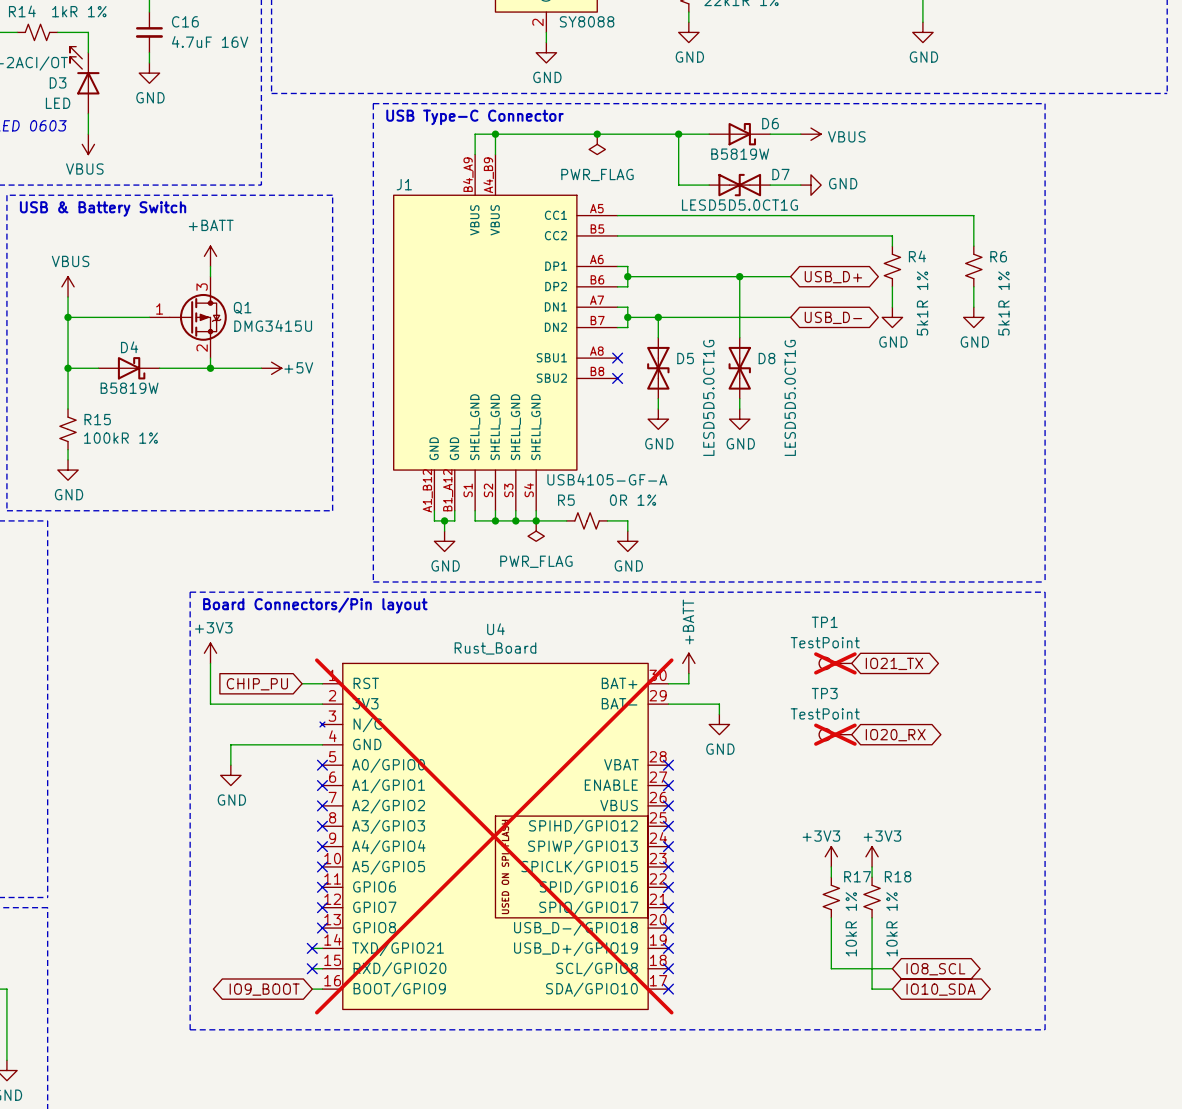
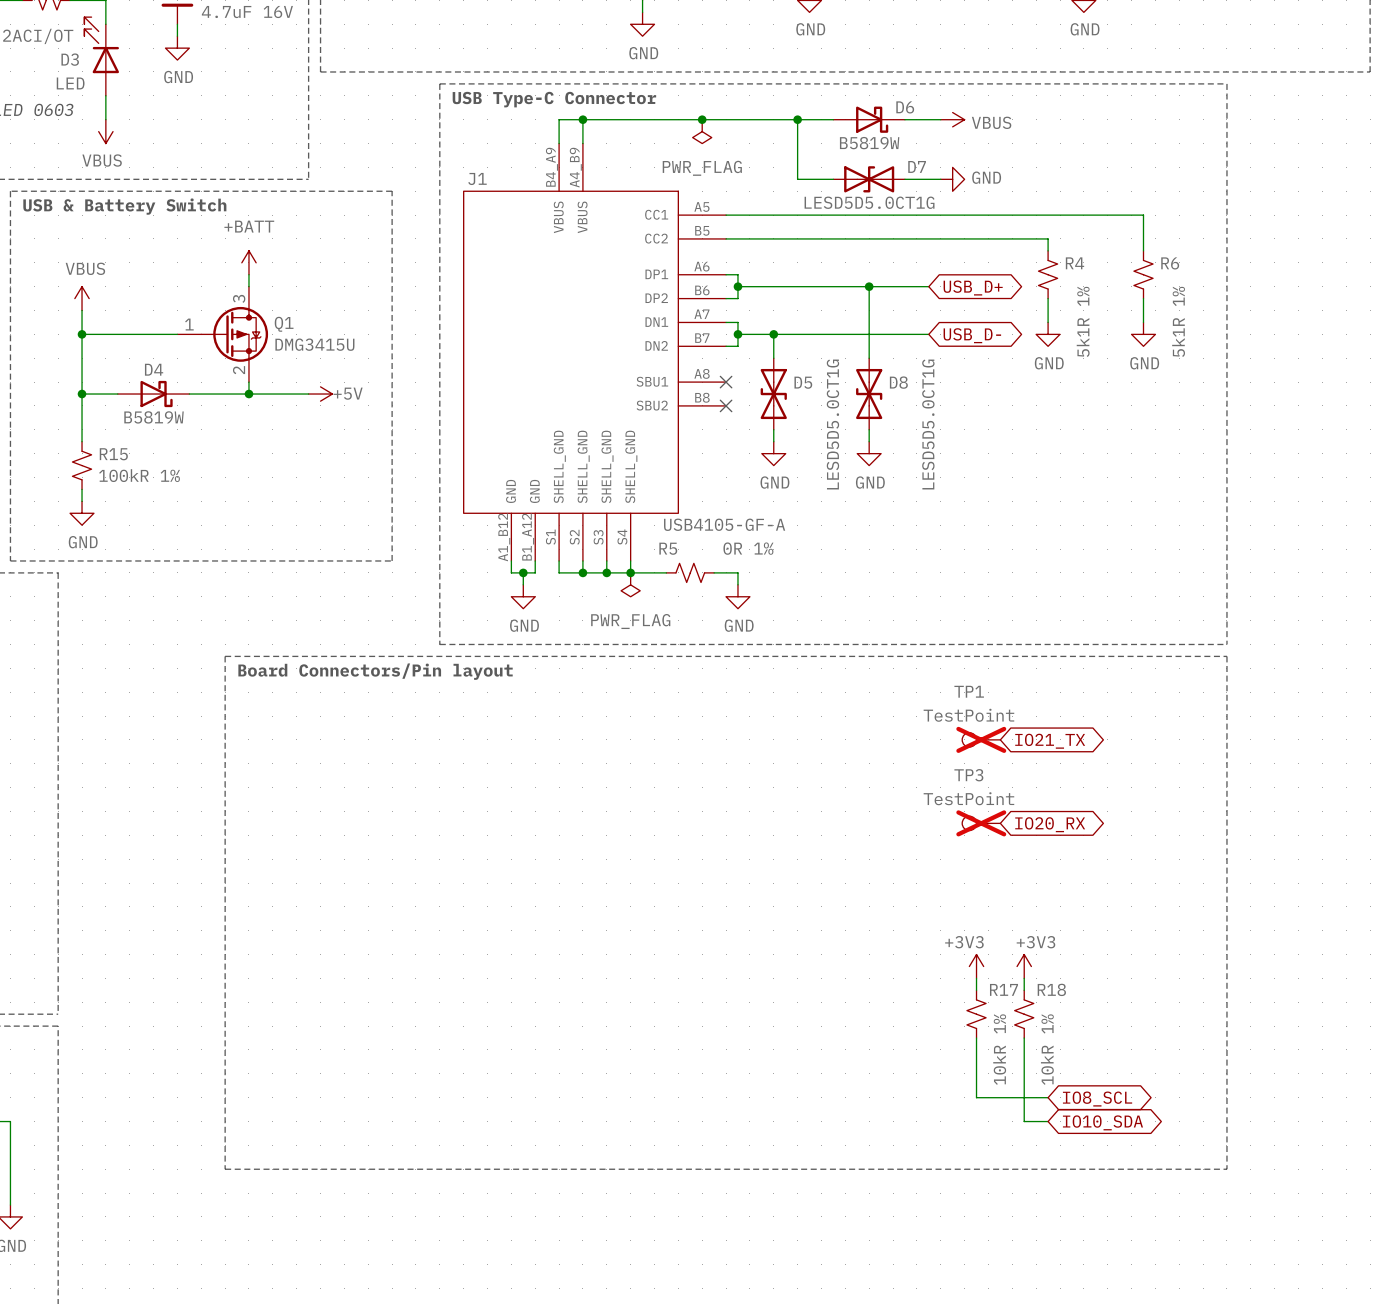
power symbol: +3V3 (210, 653) -> none
wire: (210, 663) (210, 704) (322, 704) -> none
power symbol: +BATT (688, 663) -> none
wire: (688, 673) (688, 683) (668, 683) -> none
wire: (302, 683) (322, 683) -> none
global label: CHIP_PU (257, 684) -> none
wire: (668, 704) (719, 704) (719, 714) -> none
power symbol: GND (719, 724) -> none
wire: (322, 744) (230, 744) (230, 765) -> none
no-connect mark: (322, 765) -> none
no-connect mark: (668, 765) -> none
power symbol: GND (230, 775) -> none
no-connect mark: (322, 785) -> none
no-connect mark: (668, 785) -> none
no-connect mark: (322, 805) -> none
no-connect mark: (668, 805) -> none
no-connect mark: (322, 826) -> none
no-connect mark: (668, 826) -> none
U4: Rust_Board (494, 836) -> none
no-connect mark: (322, 846) -> none
no-connect mark: (668, 846) -> none
no-connect mark: (322, 866) -> none
no-connect mark: (668, 866) -> none
no-connect mark: (322, 887) -> none
no-connect mark: (668, 887) -> none
no-connect mark: (322, 907) -> none
no-connect mark: (668, 907) -> none
no-connect mark: (322, 928) -> none
no-connect mark: (668, 928) -> none
wire: (312, 948) (322, 948) -> none
no-connect mark: (312, 948) -> none
no-connect mark: (668, 948) -> none
wire: (312, 968) (322, 968) -> none
no-connect mark: (312, 968) -> none
no-connect mark: (668, 968) -> none
global label: IO9_BOOT (264, 989) -> none
wire: (312, 989) (322, 989) -> none
no-connect mark: (668, 989) -> none

